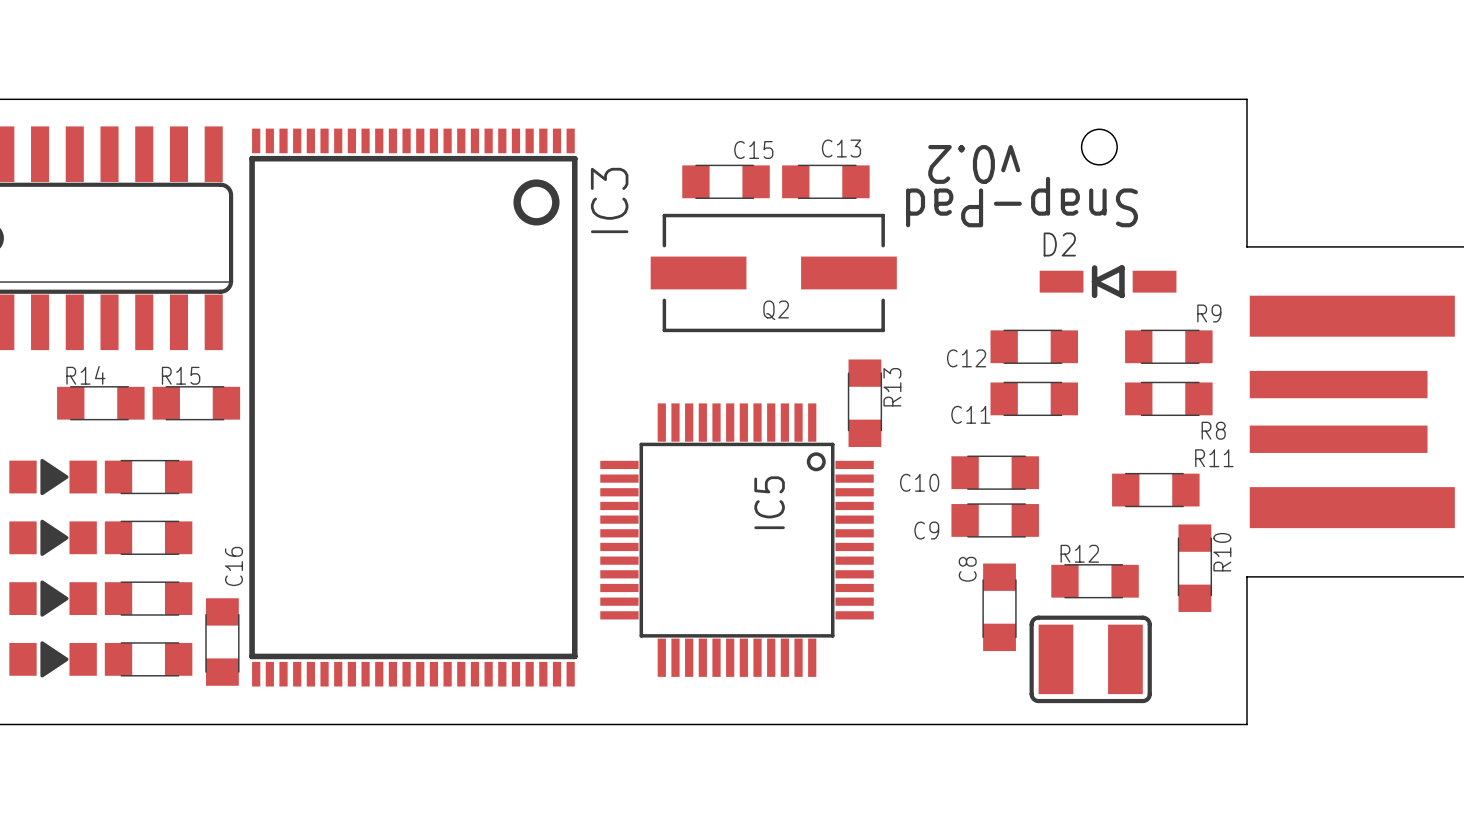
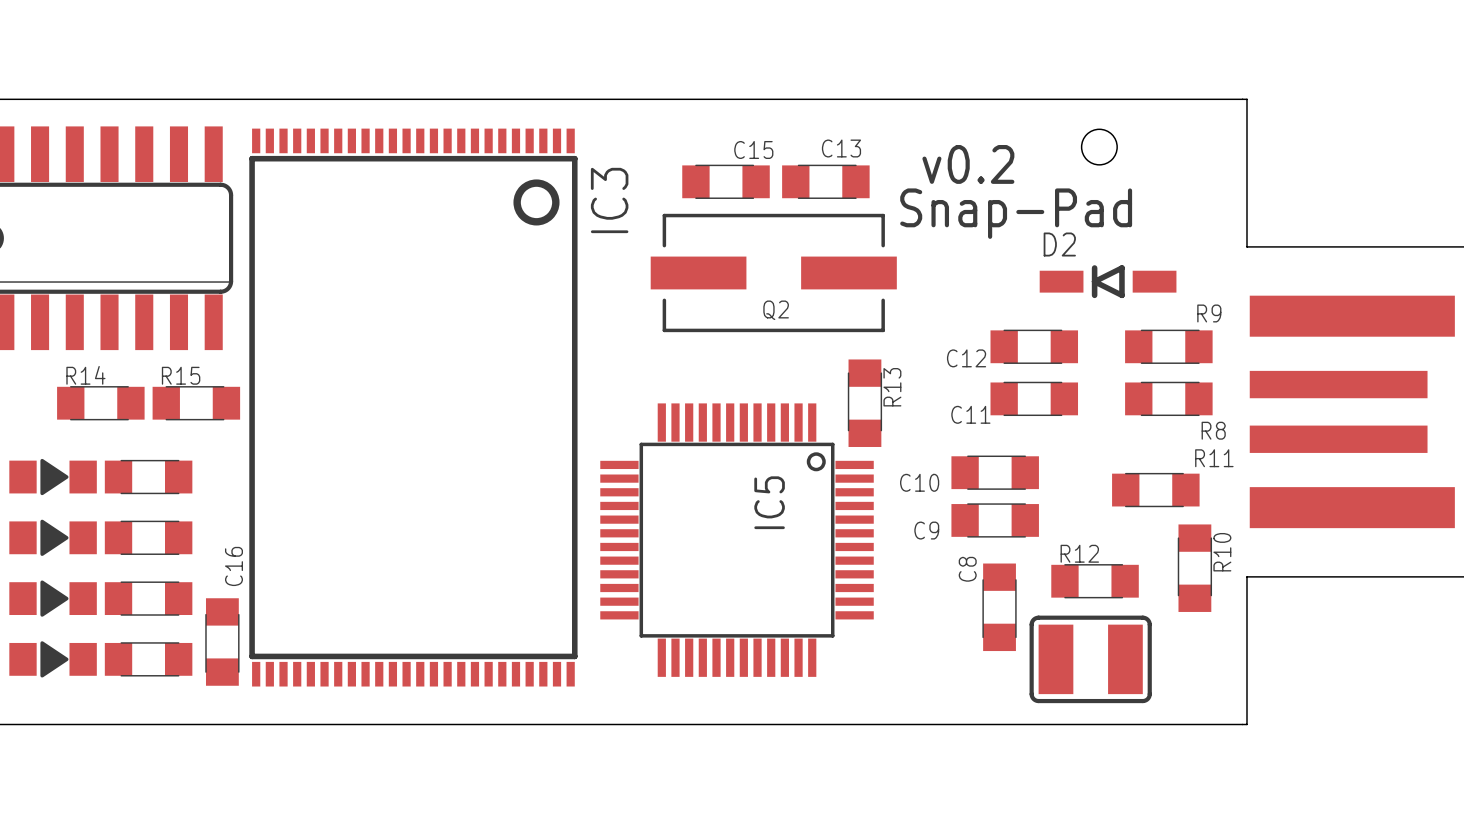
text rotation: 0° (974, 164) -> 180° (968, 164)
text rotation: 0° (1021, 202) -> 180° (1016, 213)

